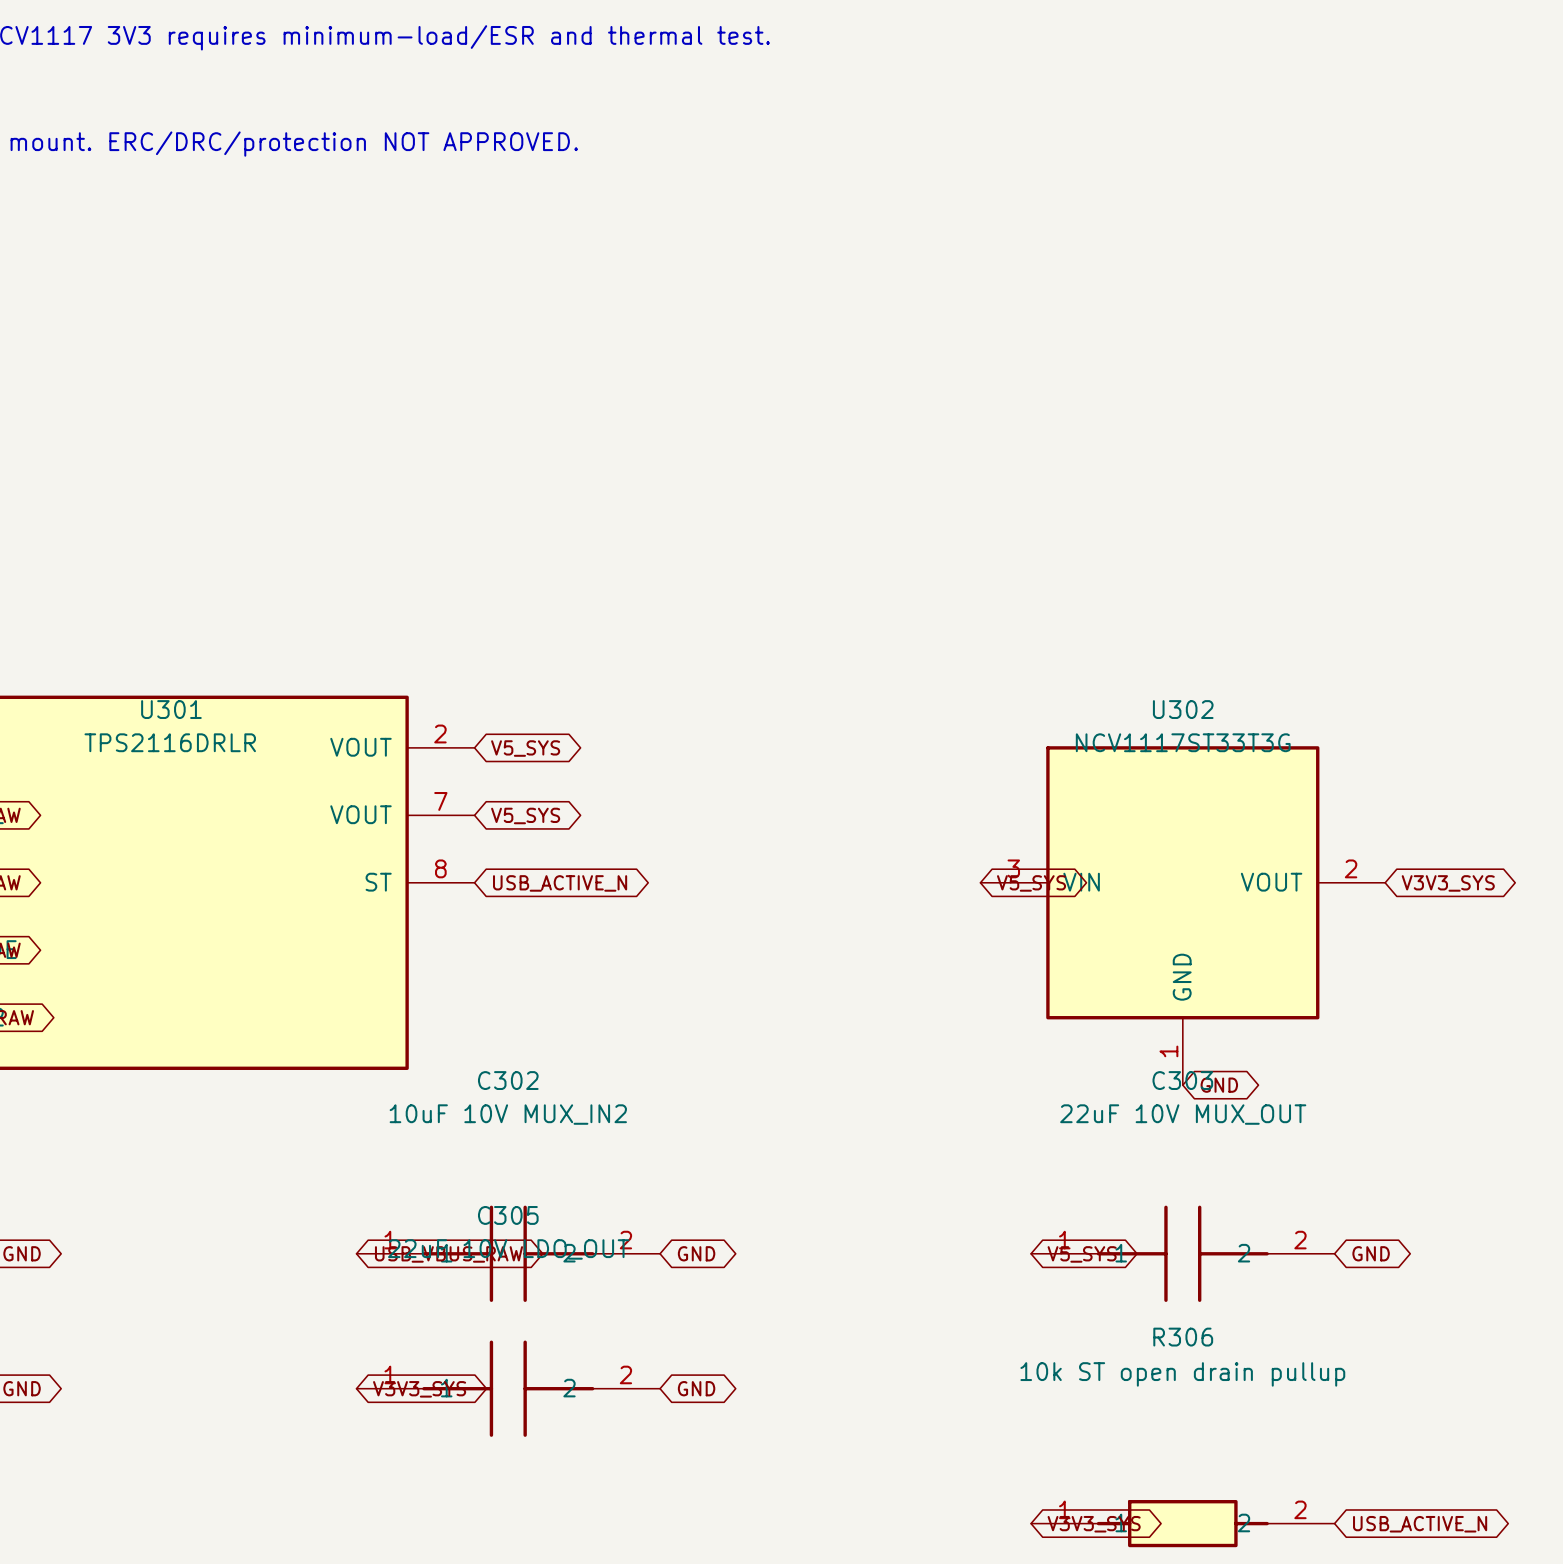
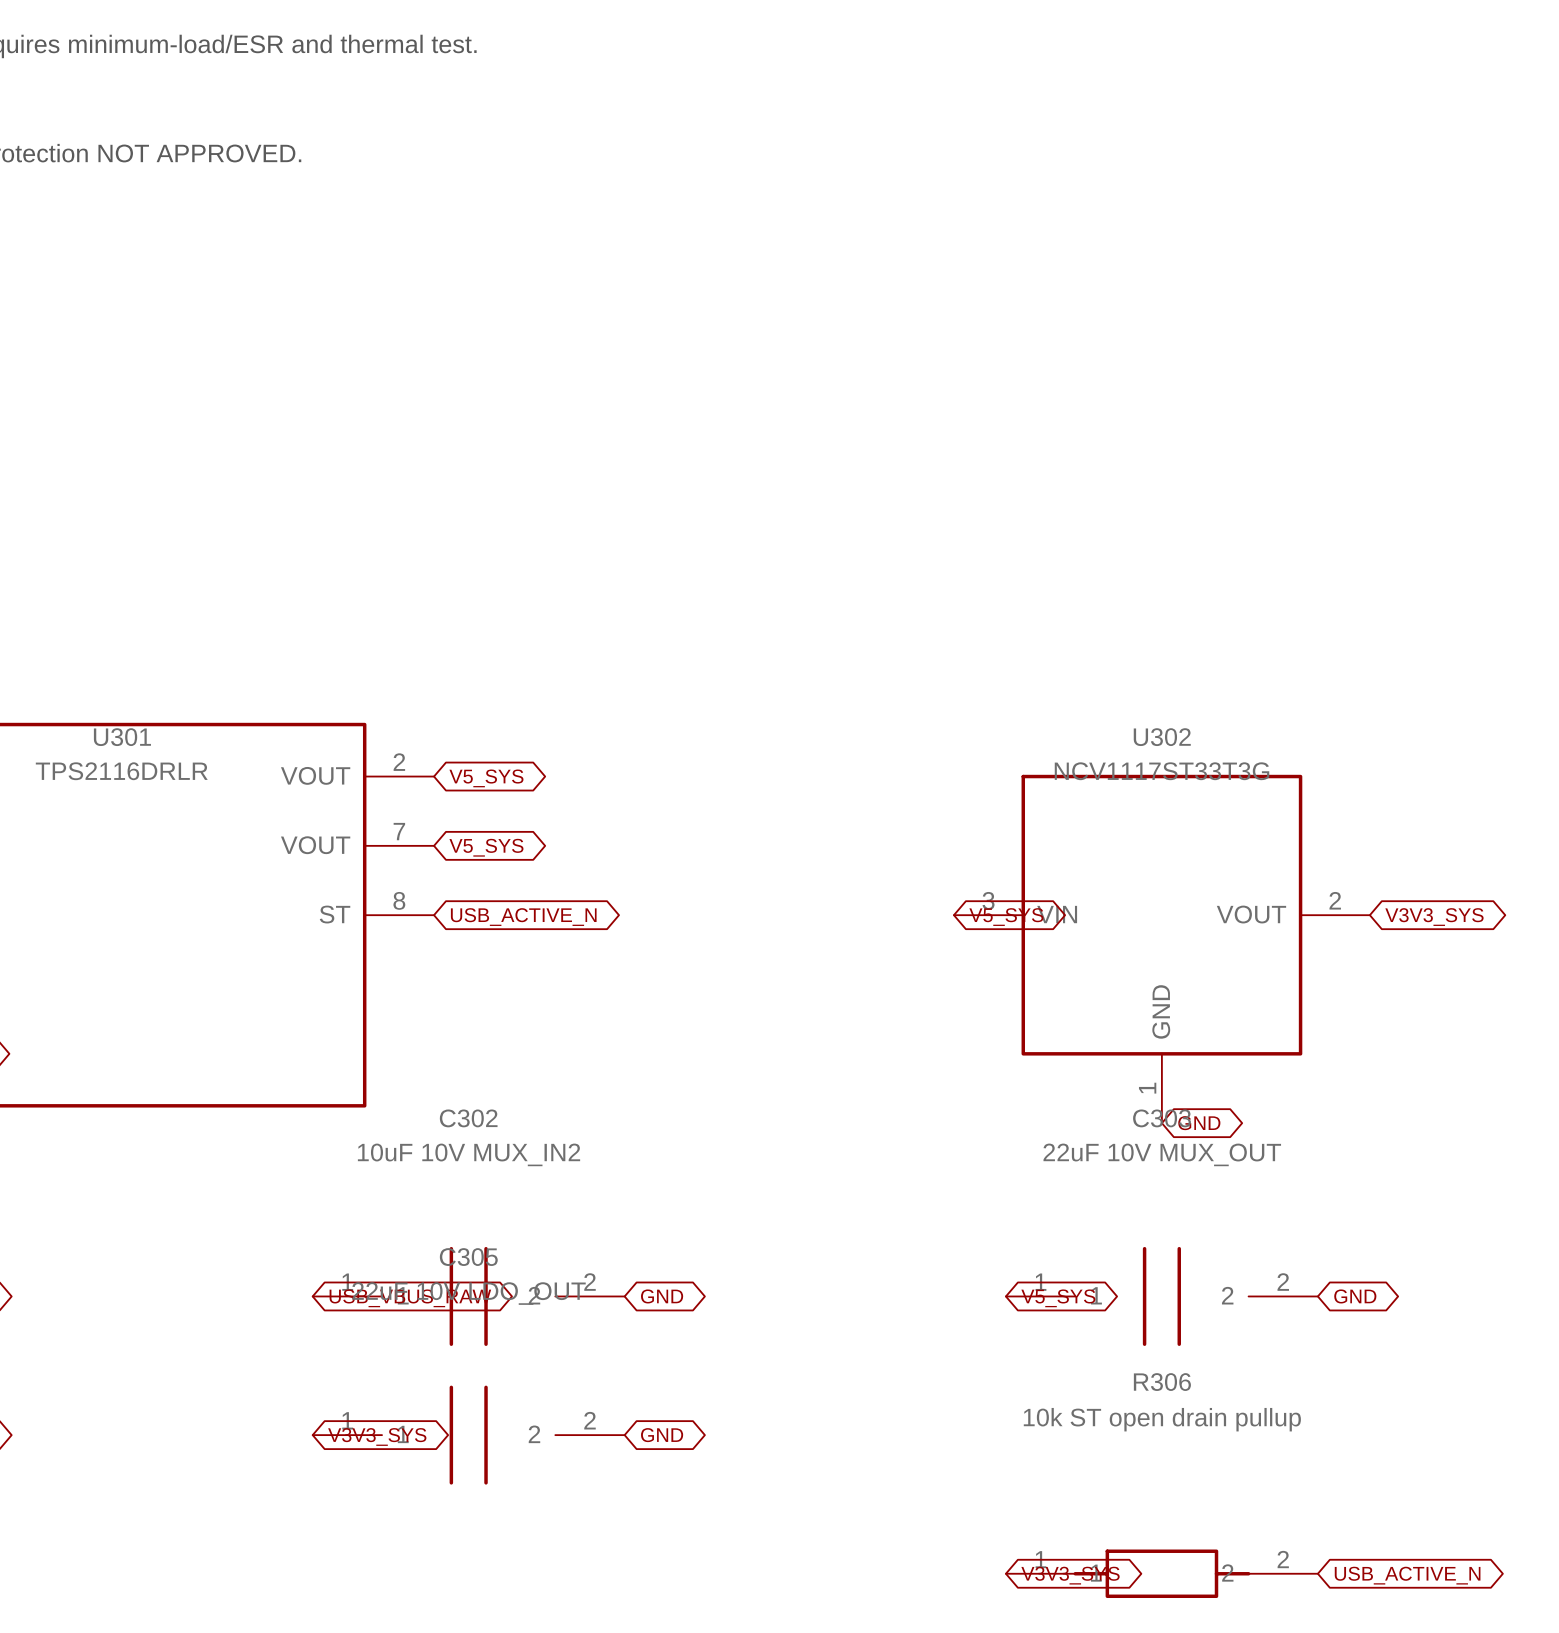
C302 symbol: [356, 1205, 661, 1302] -> [312, 1246, 625, 1346]
C303 symbol: [1031, 1205, 1335, 1302] -> [1005, 1246, 1318, 1346]
C305 symbol: [356, 1340, 661, 1437] -> [312, 1385, 625, 1485]

